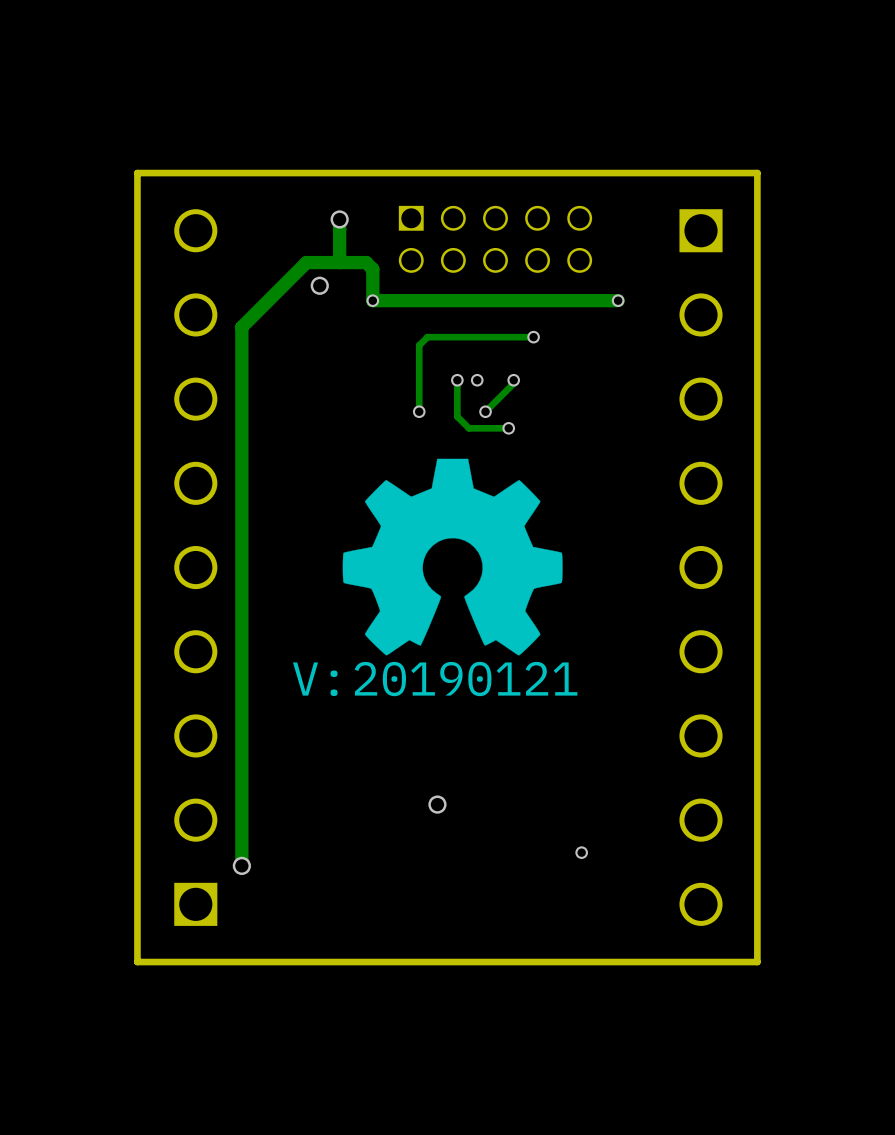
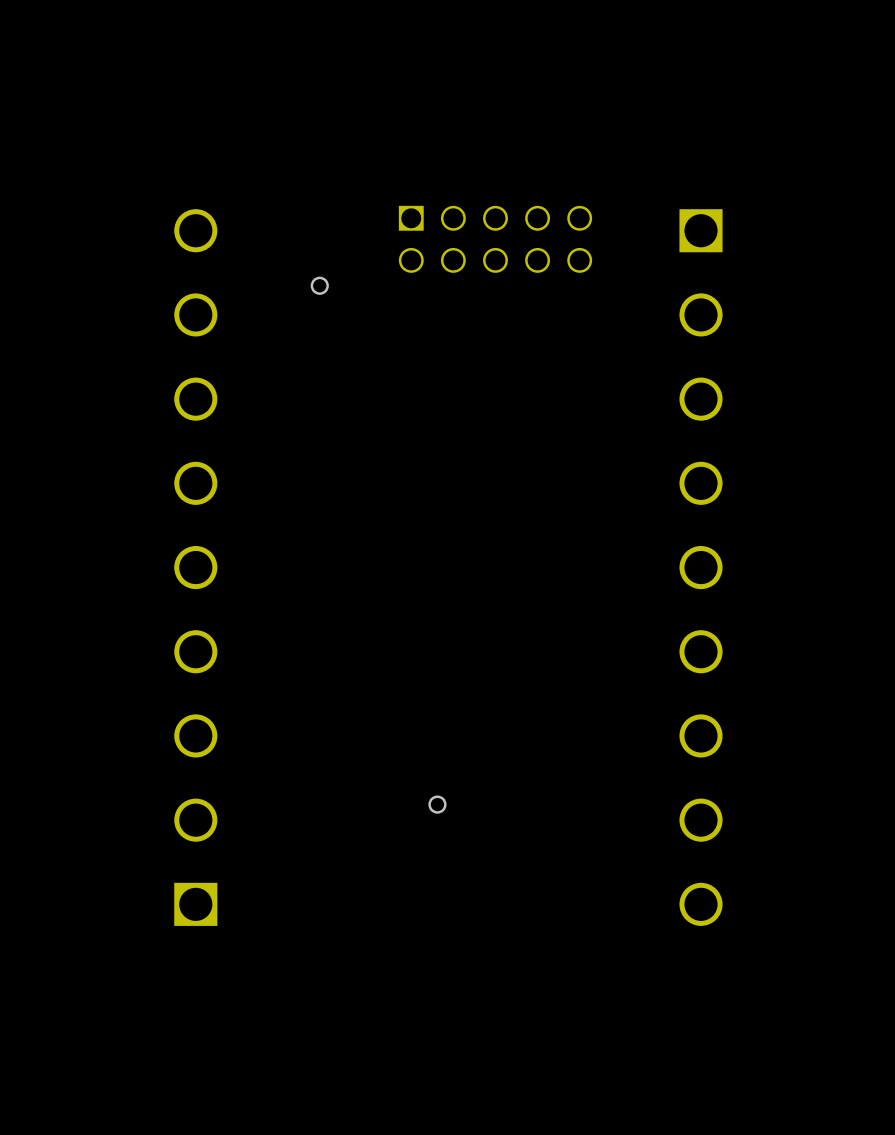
board edge: (757, 173) (757, 962) (137, 962) (137, 173) (757, 173) -> none
track: (339, 219) (339, 262) -> none
via: (339, 219) -> none
via: (372, 300) -> none
track: (618, 300) (372, 300) (372, 269) (366, 262) (306, 262) (241, 327) (241, 865) -> none
via: (618, 300) -> none
track: (533, 337) (427, 337) (419, 345) (419, 411) -> none
via: (533, 337) -> none
track: (457, 380) (457, 416) (468, 428) (508, 428) -> none
via: (457, 380) -> none
via: (477, 380) -> none
track: (513, 380) (513, 383) (485, 411) -> none
via: (513, 380) -> none
via: (419, 411) -> none
via: (485, 411) -> none
via: (508, 428) -> none
drawing: [342, 458, 563, 656] -> none
via: (581, 852) -> none
via: (241, 865) -> none

